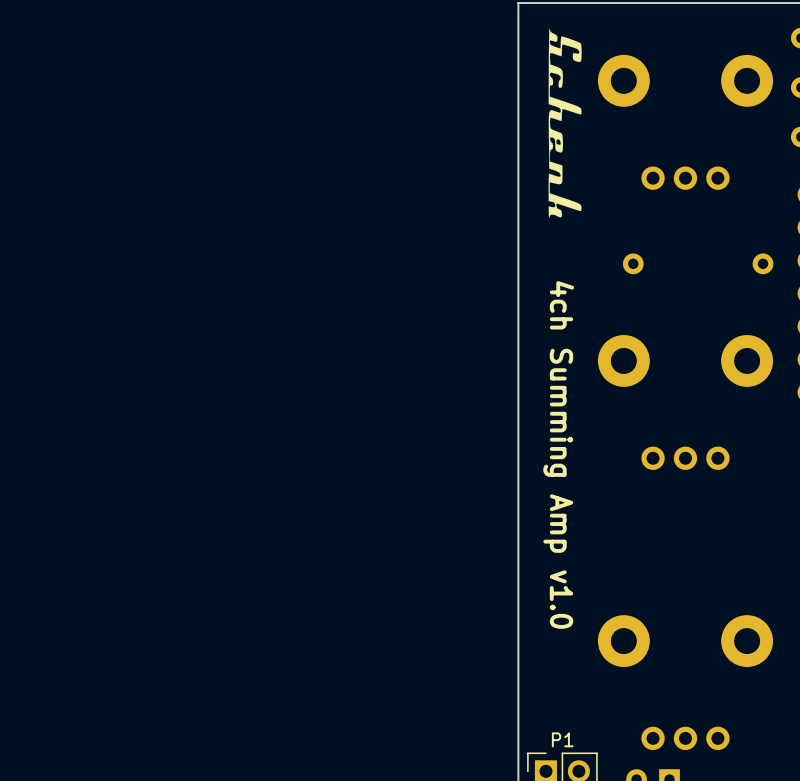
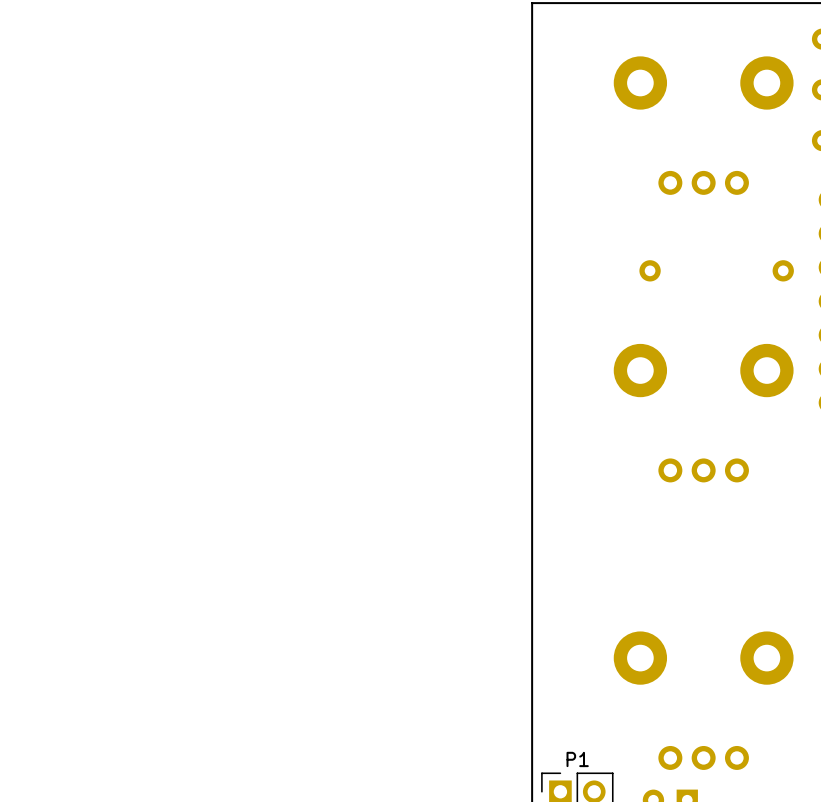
drawing: [548, 28, 582, 219] -> none
text: 4ch Summing Amp v1.0 (558, 454) -> none

